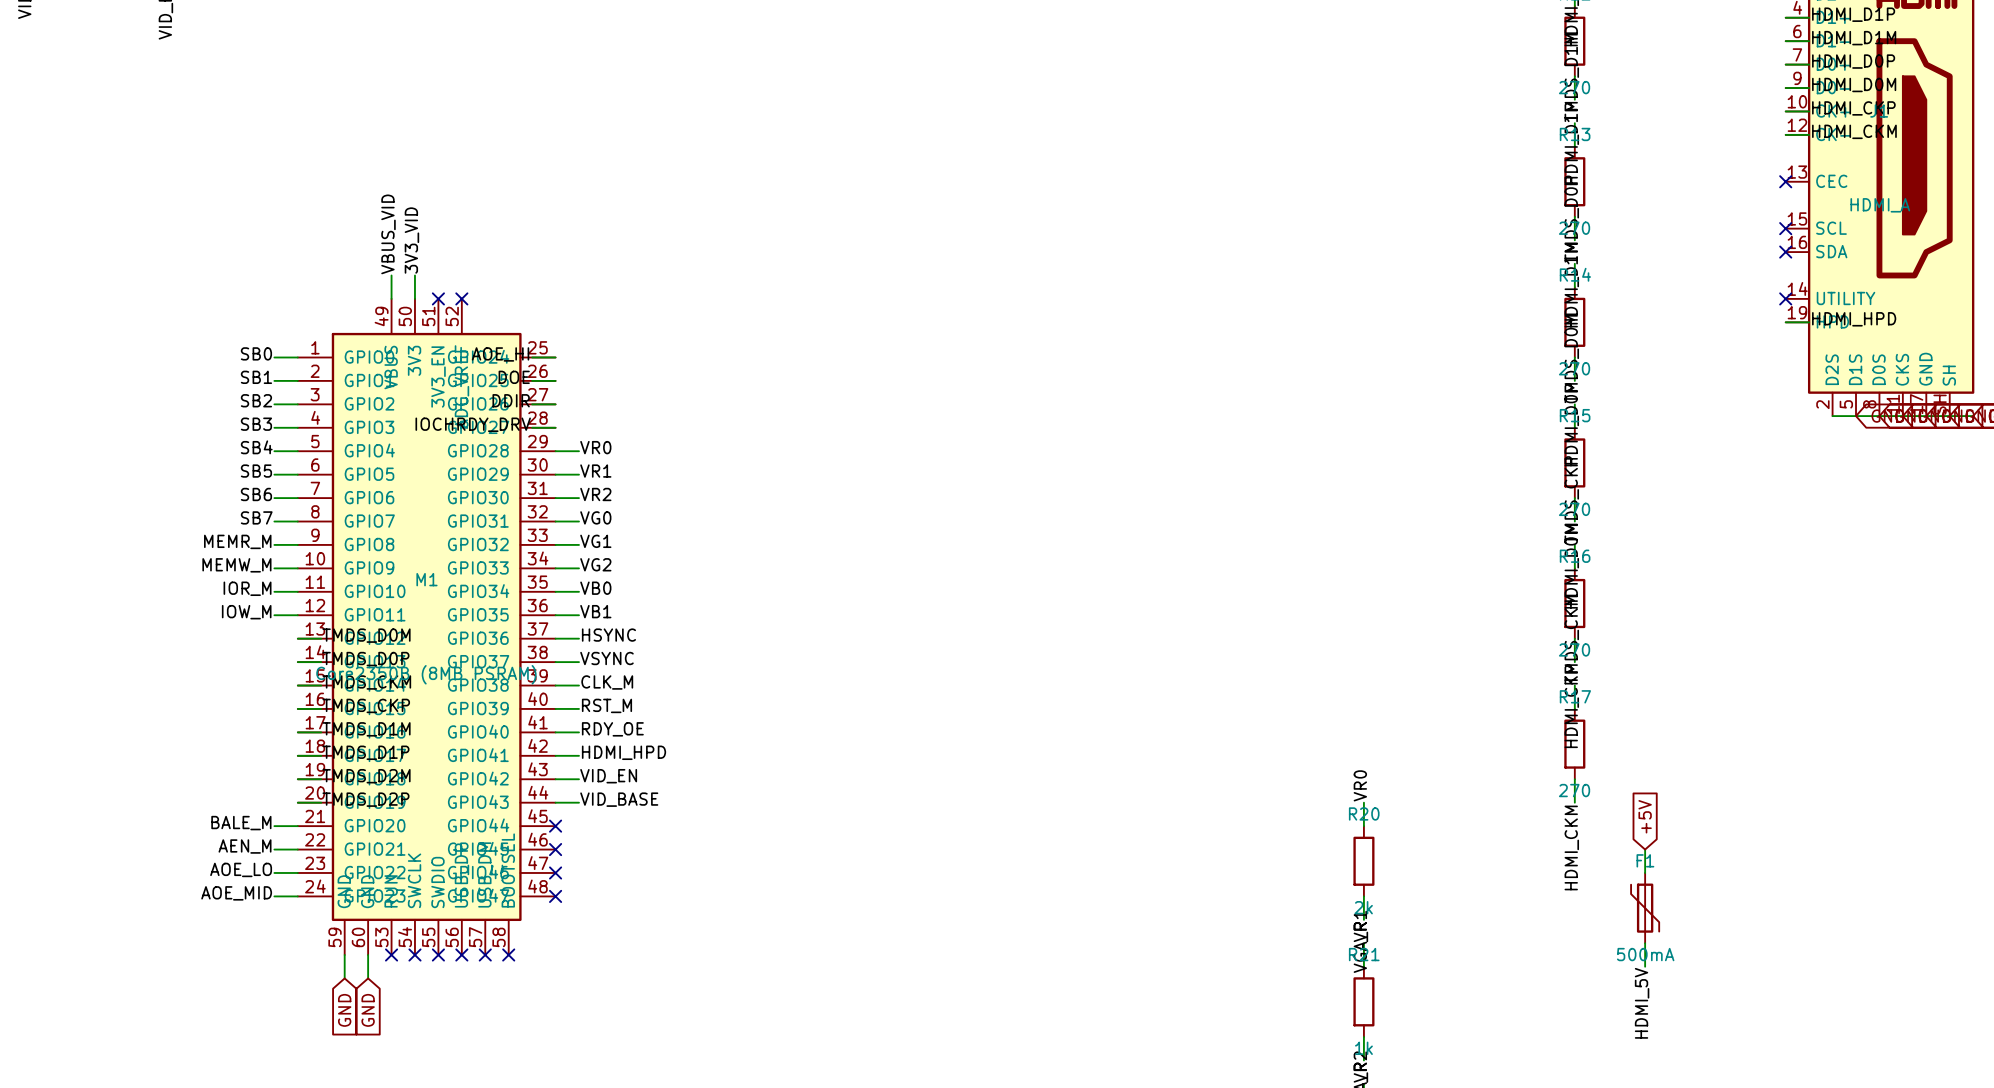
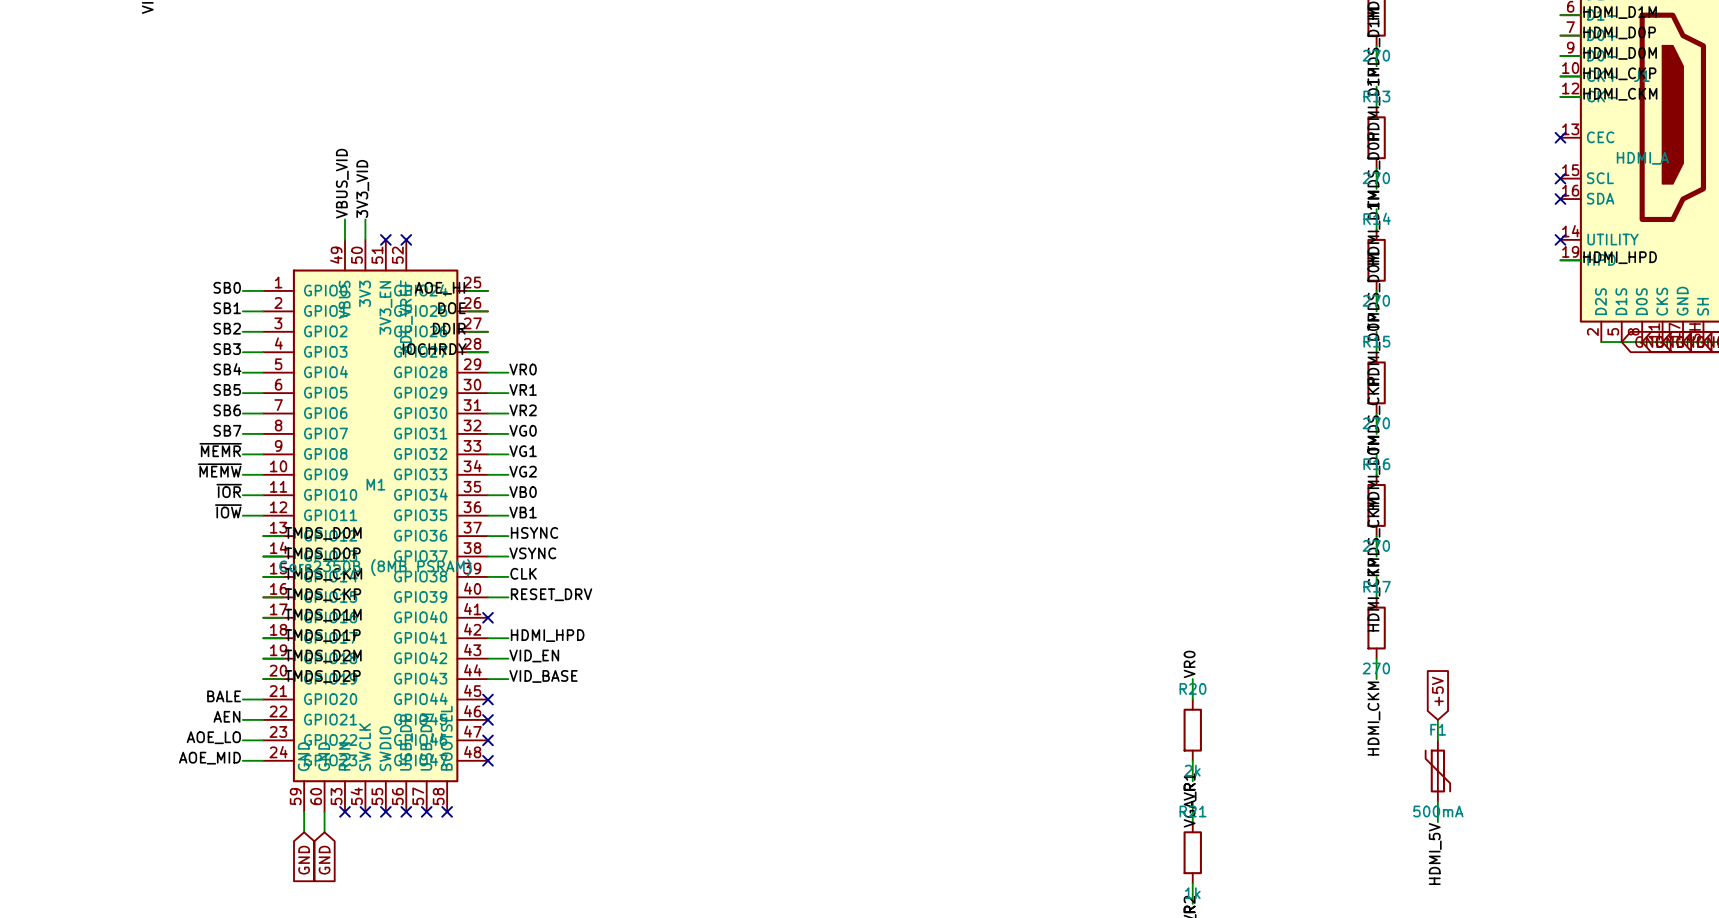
label: IOCHRDY_DRV (473, 424) -> IOCHRDY (434, 349)
label: MEMR_M (237, 541) -> ~{MEMR} (220, 450)
label: MEMW_M (236, 565) -> ~{MEMW} (219, 470)
label: IOR_M (247, 588) -> ~{IOR} (229, 490)
label: IOW_M (246, 612) -> ~{IOW} (228, 511)
label: CLK_M (607, 682) -> CLK (523, 573)
label: RST_M (606, 705) -> RESET_DRV (551, 594)
label: RDY_OE (612, 729) -> none
wire: (555, 732) (579, 732) -> none
no-connect mark: none -> (487, 617)
label: BALE_M (241, 823) -> BALE (224, 696)
label: AEN_M (245, 846) -> AEN (226, 716)

